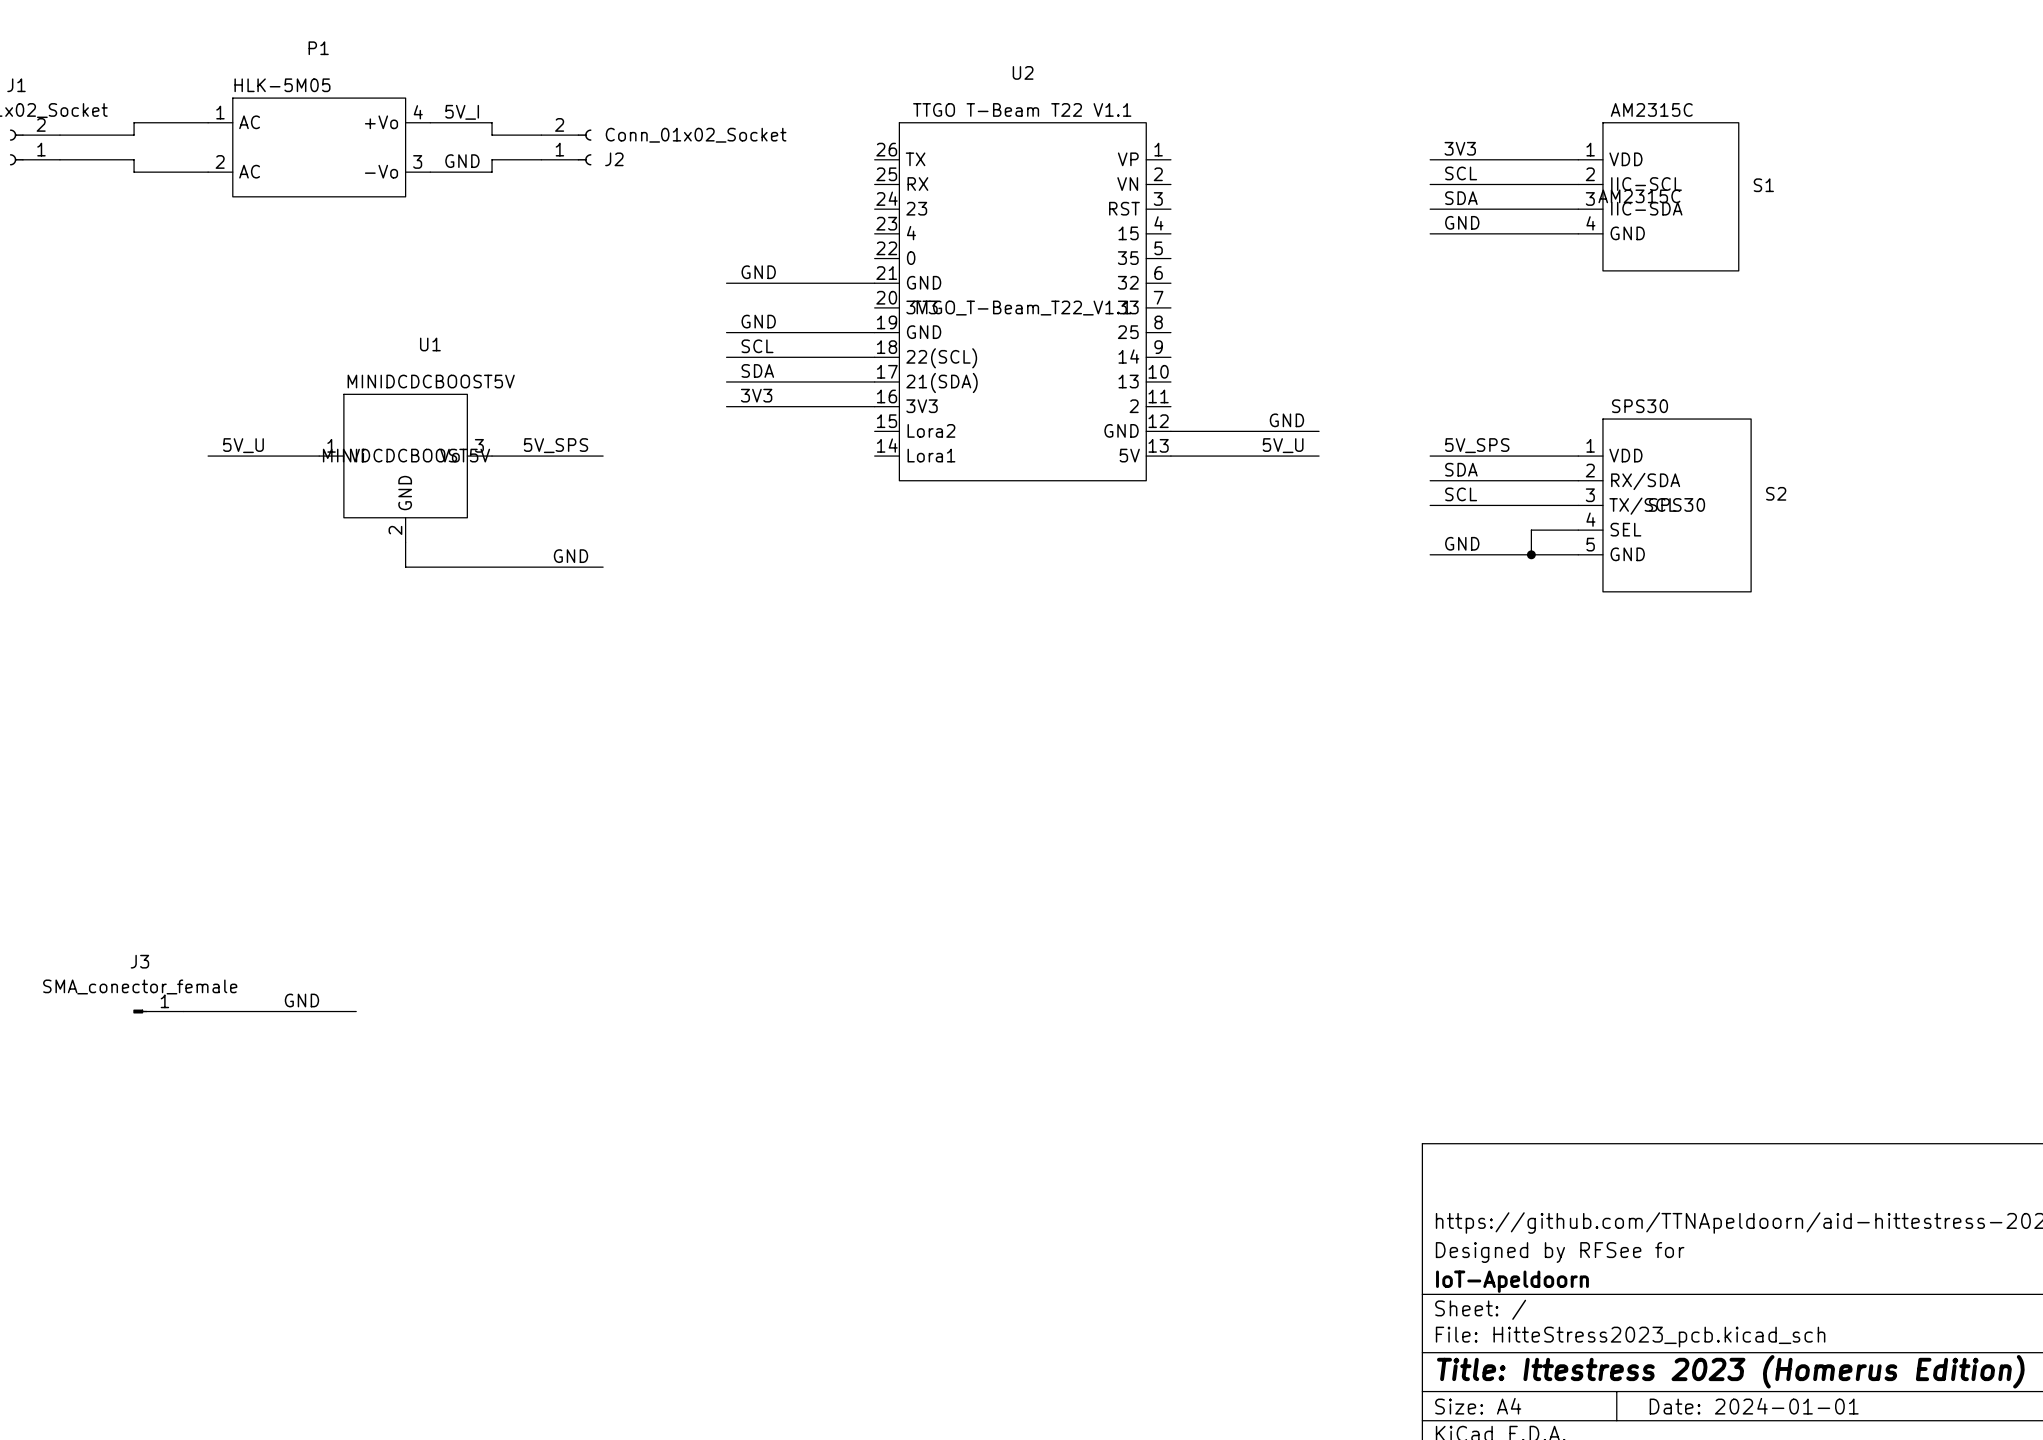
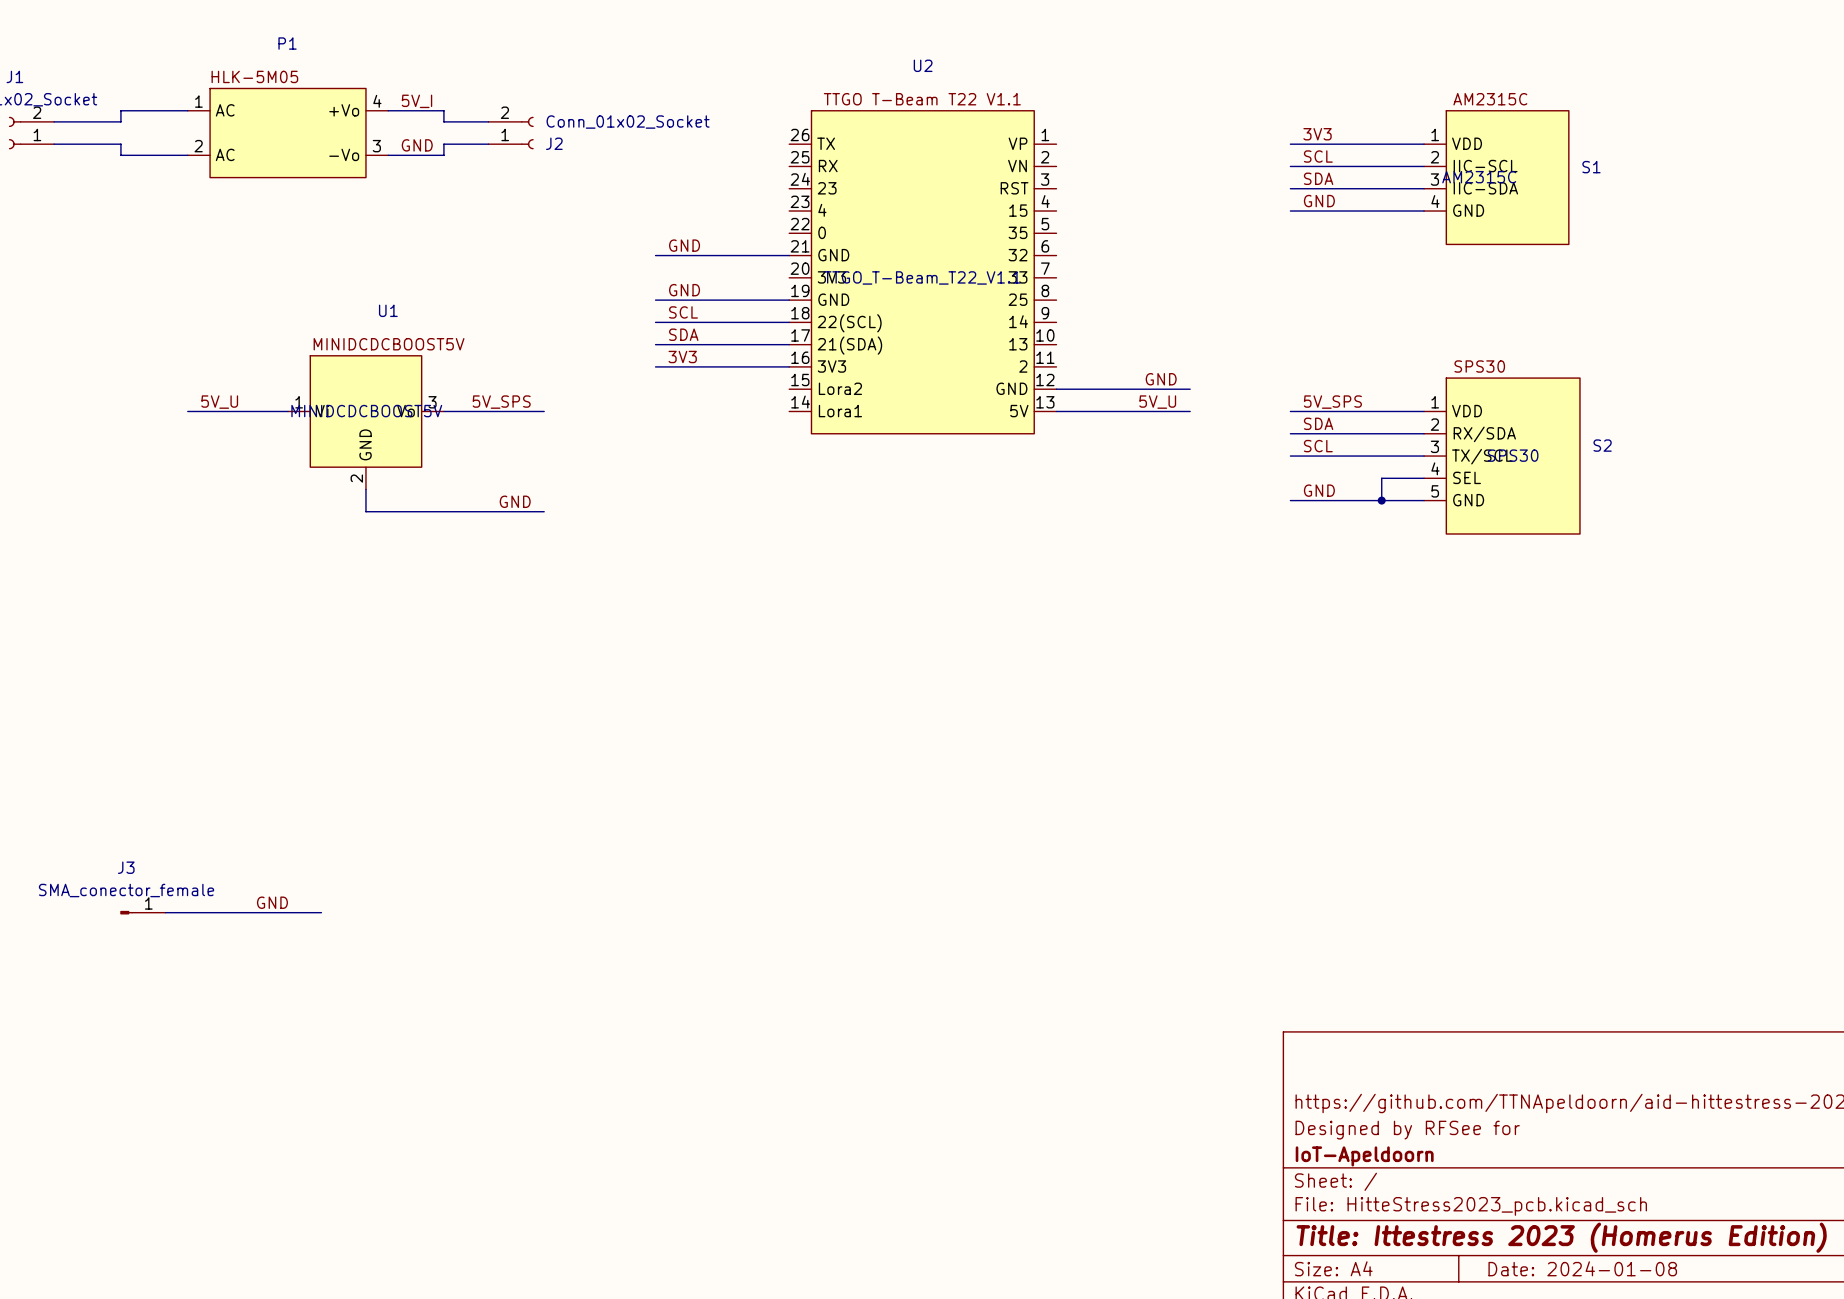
title block: Date: 2024-01-01 (1754, 1406) -> Date: 2024-01-08 (1582, 1268)

